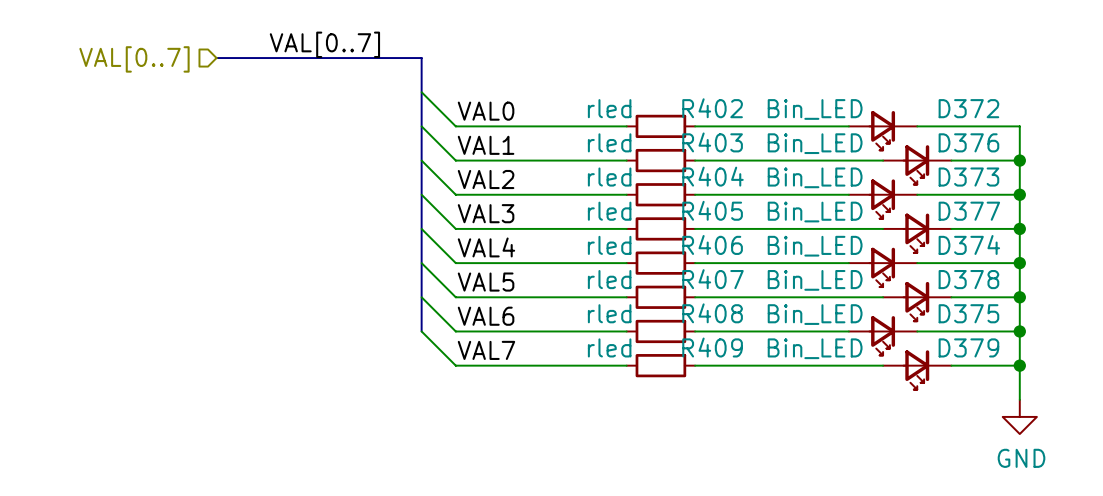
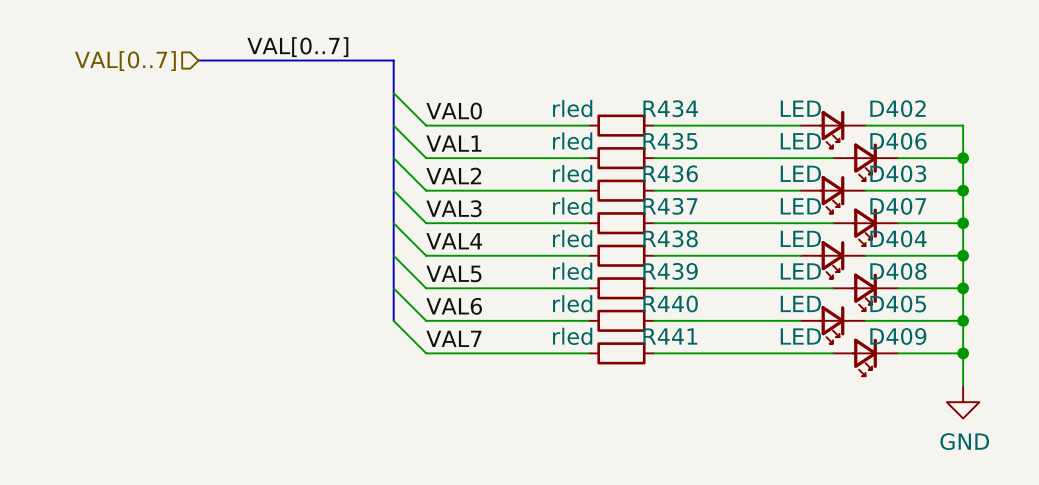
R402 name: R402 (712, 108) -> R434 (670, 108)
D372 name: D372 (968, 108) -> D402 (898, 108)
D372 value: Bin_LED (815, 109) -> LED (800, 108)
R403 name: R403 (712, 142) -> R435 (670, 141)
D376 name: D376 (968, 142) -> D406 (898, 141)
D376 value: Bin_LED (815, 143) -> LED (800, 141)
R404 name: R404 (712, 176) -> R436 (670, 173)
D373 value: Bin_LED (815, 177) -> LED (800, 173)
D373 name: D373 (968, 177) -> D403 (898, 173)
R405 name: R405 (712, 210) -> R437 (670, 206)
D377 name: D377 (969, 211) -> D407 (898, 206)
D377 value: Bin_LED (815, 212) -> LED (800, 206)
R406 name: R406 (712, 244) -> R438 (670, 238)
D374 name: D374 (969, 244) -> D404 (898, 238)
D374 value: Bin_LED (815, 246) -> LED (800, 238)
R407 name: R407 (712, 279) -> R439 (670, 271)
D378 name: D378 (968, 279) -> D408 (898, 271)
D378 value: Bin_LED (815, 280) -> LED (800, 271)
R408 name: R408 (712, 313) -> R440 (670, 303)
D375 name: D375 (968, 313) -> D405 (898, 303)
D375 value: Bin_LED (815, 314) -> LED (800, 303)
R409 name: R409 (712, 347) -> R441 (670, 336)
D379 name: D379 (968, 347) -> D409 (898, 336)
D379 value: Bin_LED (815, 348) -> LED (800, 336)

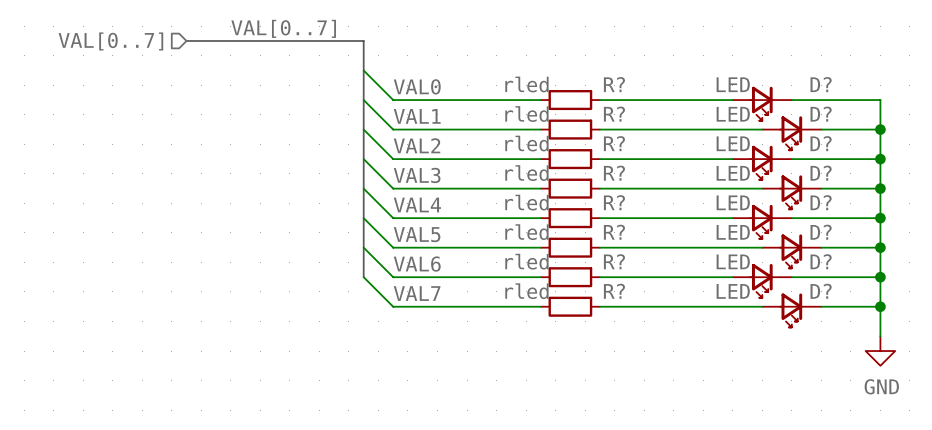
R434 name: R434 (670, 108) -> R? (614, 84)
D402 name: D402 (898, 108) -> D? (821, 84)
R435 name: R435 (670, 141) -> R? (614, 114)
D406 name: D406 (898, 141) -> D? (821, 114)
R436 name: R436 (670, 173) -> R? (614, 143)
D403 name: D403 (898, 173) -> D? (821, 143)
R437 name: R437 (670, 206) -> R? (614, 173)
D407 name: D407 (898, 206) -> D? (821, 173)
R438 name: R438 (670, 238) -> R? (614, 202)
D404 name: D404 (898, 238) -> D? (821, 202)
R439 name: R439 (670, 271) -> R? (614, 232)
D408 name: D408 (898, 271) -> D? (821, 232)
R440 name: R440 (670, 303) -> R? (614, 261)
D405 name: D405 (898, 303) -> D? (821, 261)
R441 name: R441 (670, 336) -> R? (614, 291)
D409 name: D409 (898, 336) -> D? (821, 291)

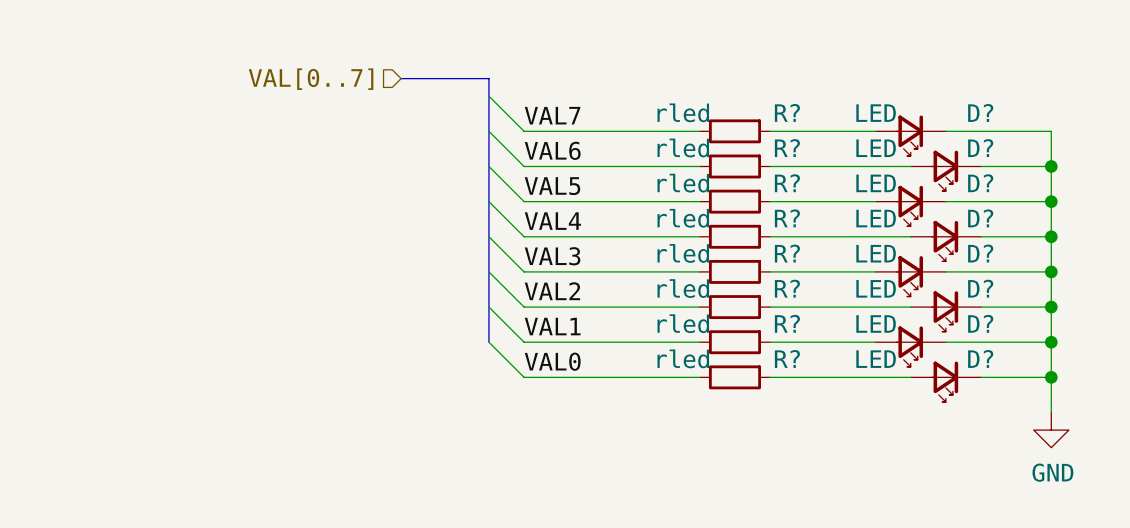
label: VAL[0..7] (283, 28) -> none
bus: (186, 40) (363, 40) (363, 277) -> none
hierarchical label position: VAL[0..7] (110, 41) -> VAL[0..7] (311, 79)
bus: none -> (401, 78) (488, 78) (488, 342)
wire: (363, 70) (393, 100) (437, 100) -> (488, 96) (524, 131)
label position: VAL0 (417, 86) -> VAL0 (552, 361)
wire: (363, 100) (393, 129) (437, 129) -> (488, 131) (524, 166)
R?: rled (570, 100) -> none
wire: (599, 100) (644, 100) -> (647, 131) (699, 131)
R?: none -> rled (734, 131)
label position: VAL1 (417, 116) -> VAL1 (552, 326)
wire: (363, 129) (393, 159) (437, 159) -> (488, 166) (524, 201)
R?: rled (570, 129) -> none
wire: (599, 129) (644, 129) -> (647, 166) (699, 166)
R?: none -> rled (734, 166)
label position: VAL2 (417, 145) -> VAL2 (552, 291)
wire: (363, 159) (393, 188) (437, 188) -> (488, 201) (524, 236)
R?: rled (570, 159) -> none
wire: (599, 159) (644, 159) -> (647, 201) (699, 201)
R?: none -> rled (734, 201)
label position: VAL3 (417, 175) -> VAL3 (552, 256)
wire: (363, 188) (393, 218) (437, 218) -> (488, 236) (524, 271)
R?: rled (570, 188) -> none
wire: (599, 188) (644, 188) -> (647, 236) (699, 236)
R?: none -> rled (734, 236)
label position: VAL4 (417, 204) -> VAL4 (552, 221)
wire: (363, 218) (393, 247) (437, 247) -> (488, 271) (524, 307)
R?: rled (570, 218) -> none
wire: (599, 218) (644, 218) -> (647, 271) (699, 271)
R?: none -> rled (734, 271)
label position: VAL5 (417, 234) -> VAL5 (552, 186)
wire: (363, 247) (393, 277) (437, 277) -> (488, 307) (524, 342)
R?: rled (570, 247) -> none
wire: (599, 247) (644, 247) -> (647, 307) (699, 307)
R?: none -> rled (734, 307)
label position: VAL6 (417, 264) -> VAL6 (552, 150)
wire: (363, 277) (393, 306) (437, 306) -> (488, 342) (524, 377)
R?: rled (570, 277) -> none
wire: (599, 277) (644, 277) -> (647, 342) (699, 342)
R?: none -> rled (734, 342)
label position: VAL7 (417, 293) -> VAL7 (552, 115)
R?: rled (570, 306) -> none
wire: (599, 306) (644, 306) -> (647, 377) (699, 377)
R?: none -> rled (734, 377)

